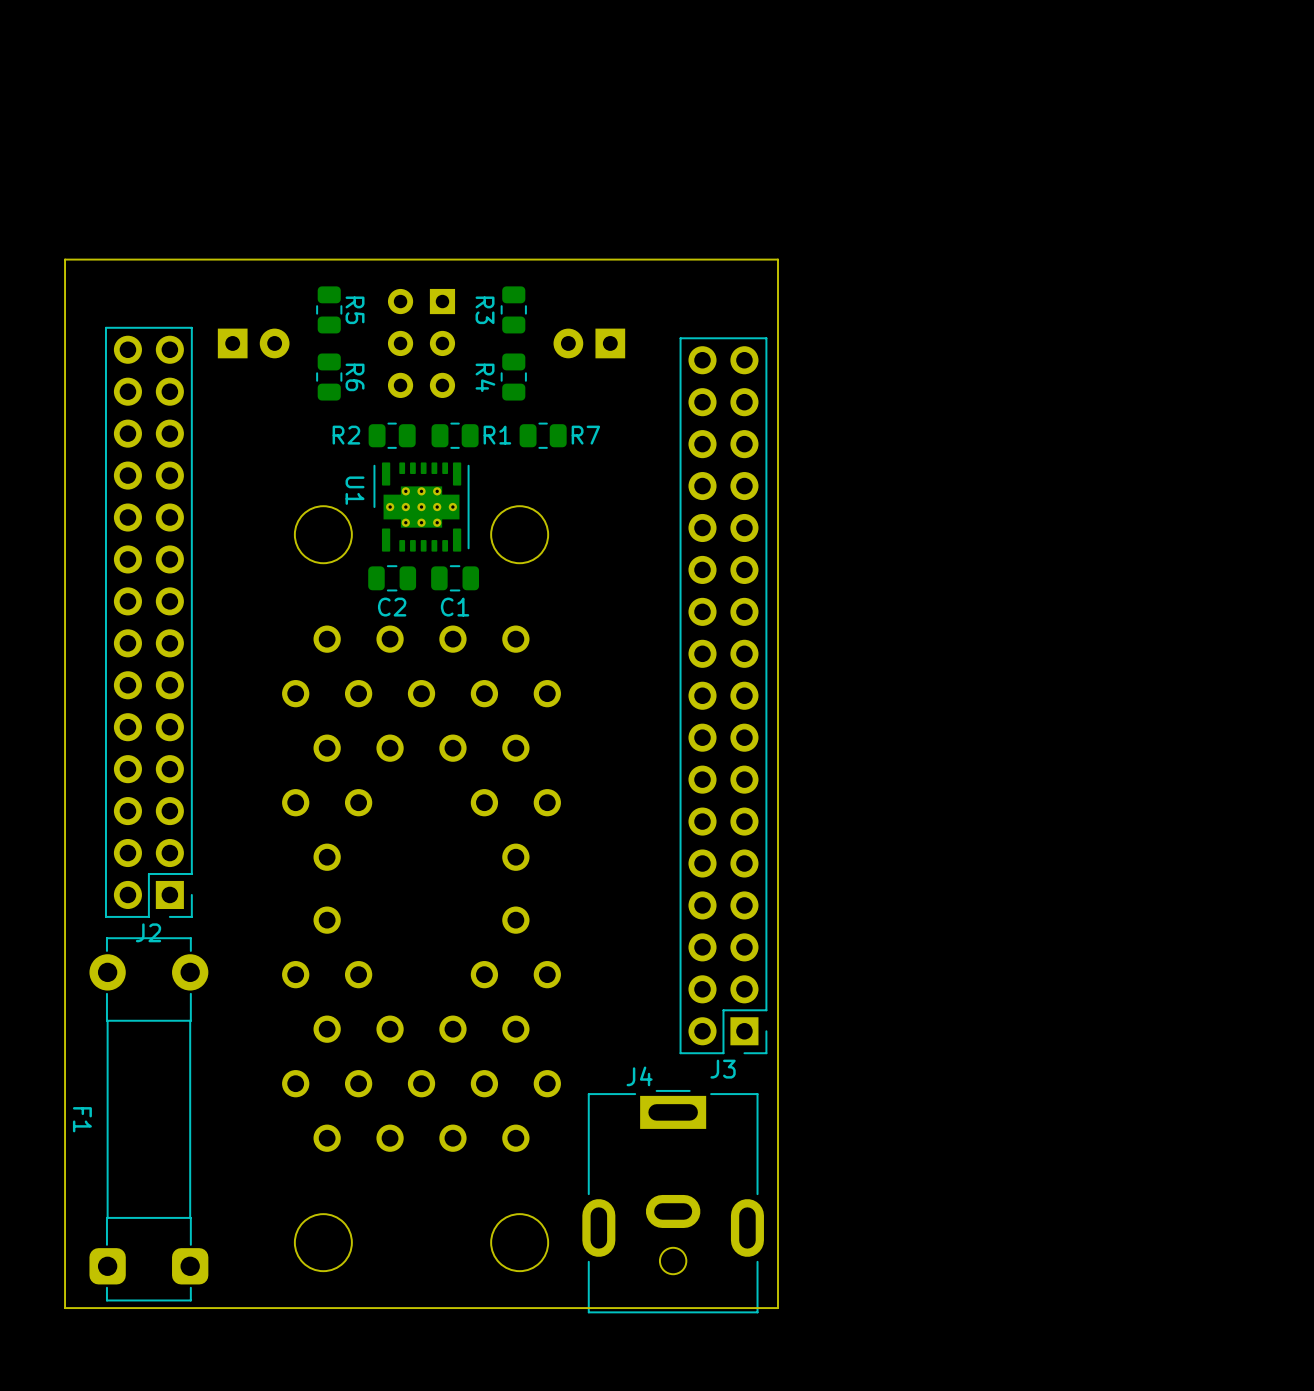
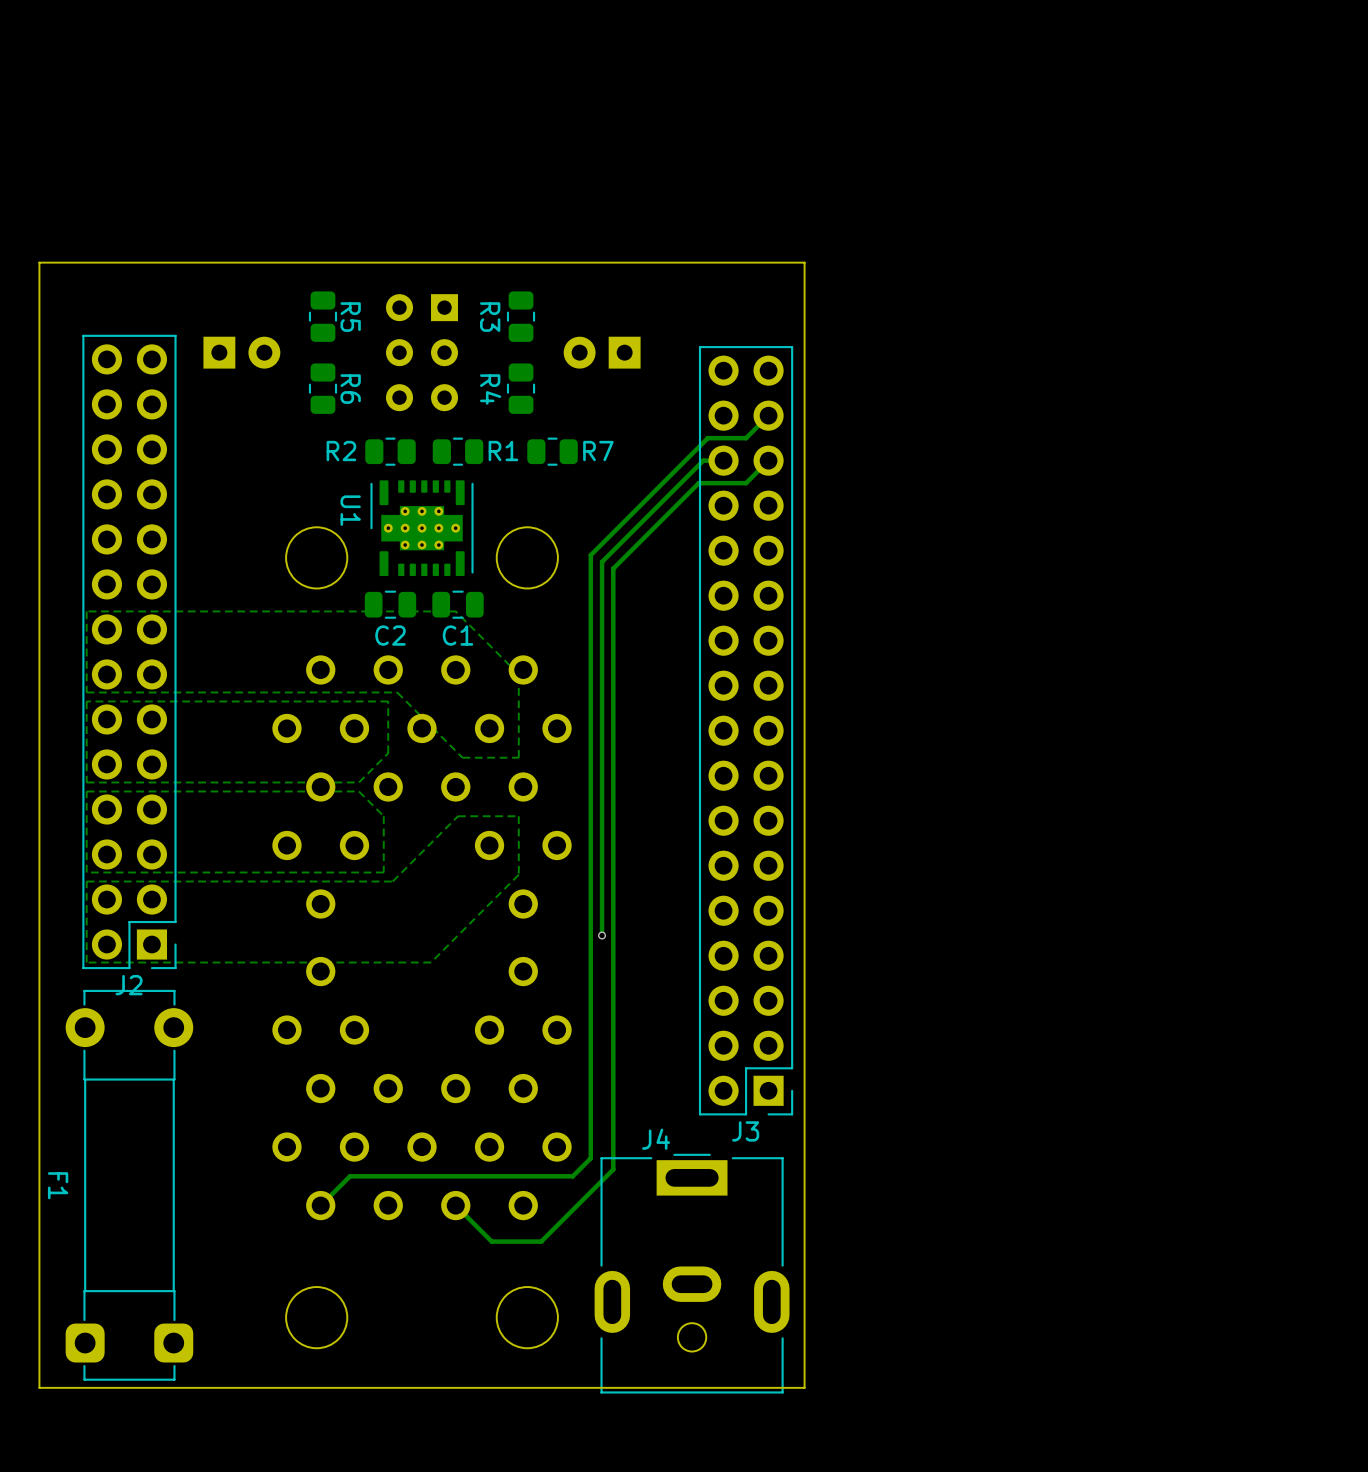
track: none -> (768, 415) (746, 438) (707, 438) (590, 555) (590, 1158) (572, 1176) (349, 1176) (320, 1205)
track: none -> (723, 460) (703, 460) (602, 561) (602, 935)
track: none -> (768, 460) (746, 483) (698, 483) (613, 568) (613, 1169) (541, 1241) (491, 1241) (455, 1205)
zone outline: none -> (455, 611) (518, 674) (518, 757) (462, 757) (397, 692) (86, 692) (86, 611) (455, 611)
zone outline: none -> (388, 701) (388, 753) (358, 782) (86, 782) (86, 701) (388, 701)
zone outline: none -> (358, 791) (86, 791) (86, 872) (383, 872) (383, 816) (358, 791)
zone outline: none -> (518, 816) (458, 816) (392, 881) (86, 881) (86, 962) (431, 962) (518, 874) (518, 816)
via: none -> (602, 935)

